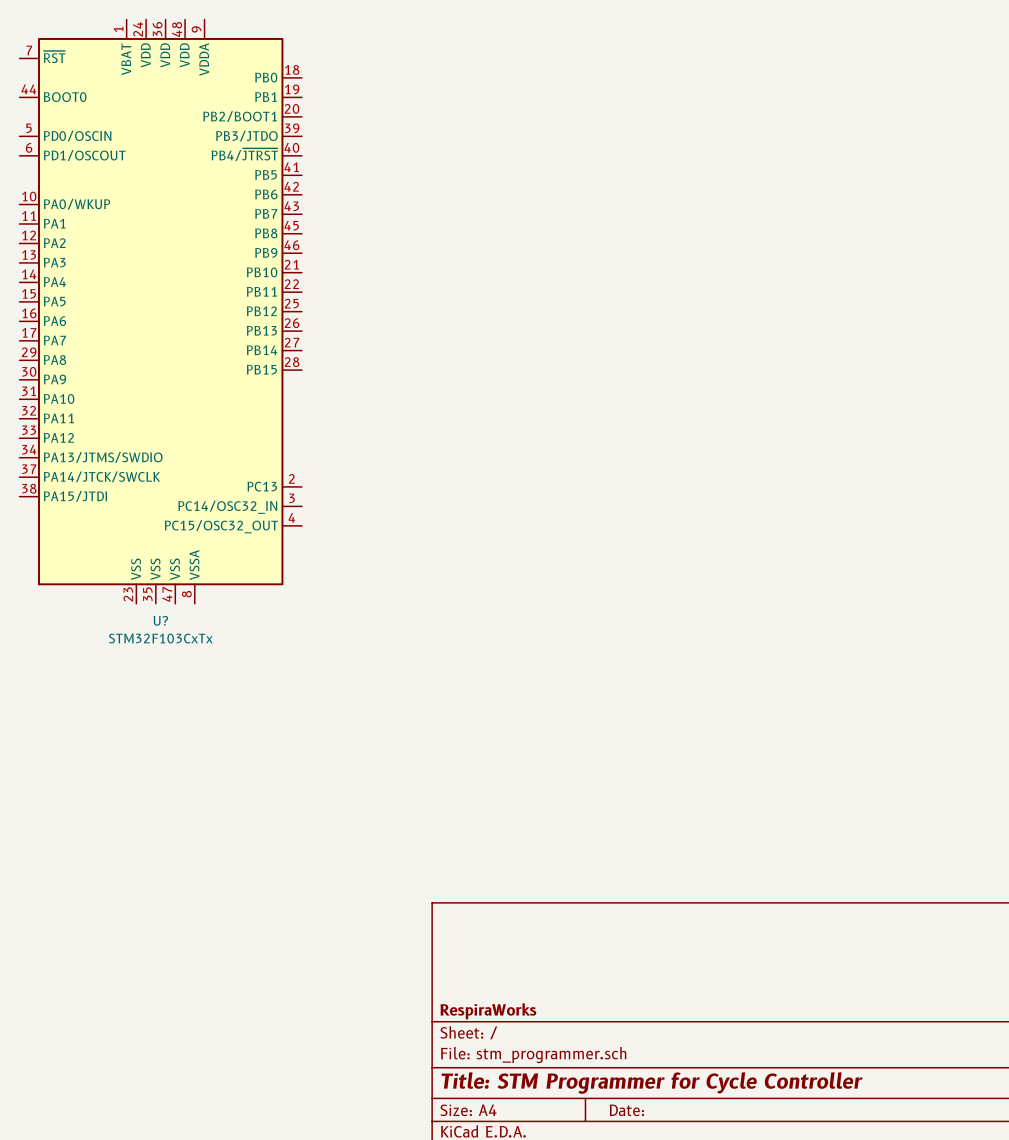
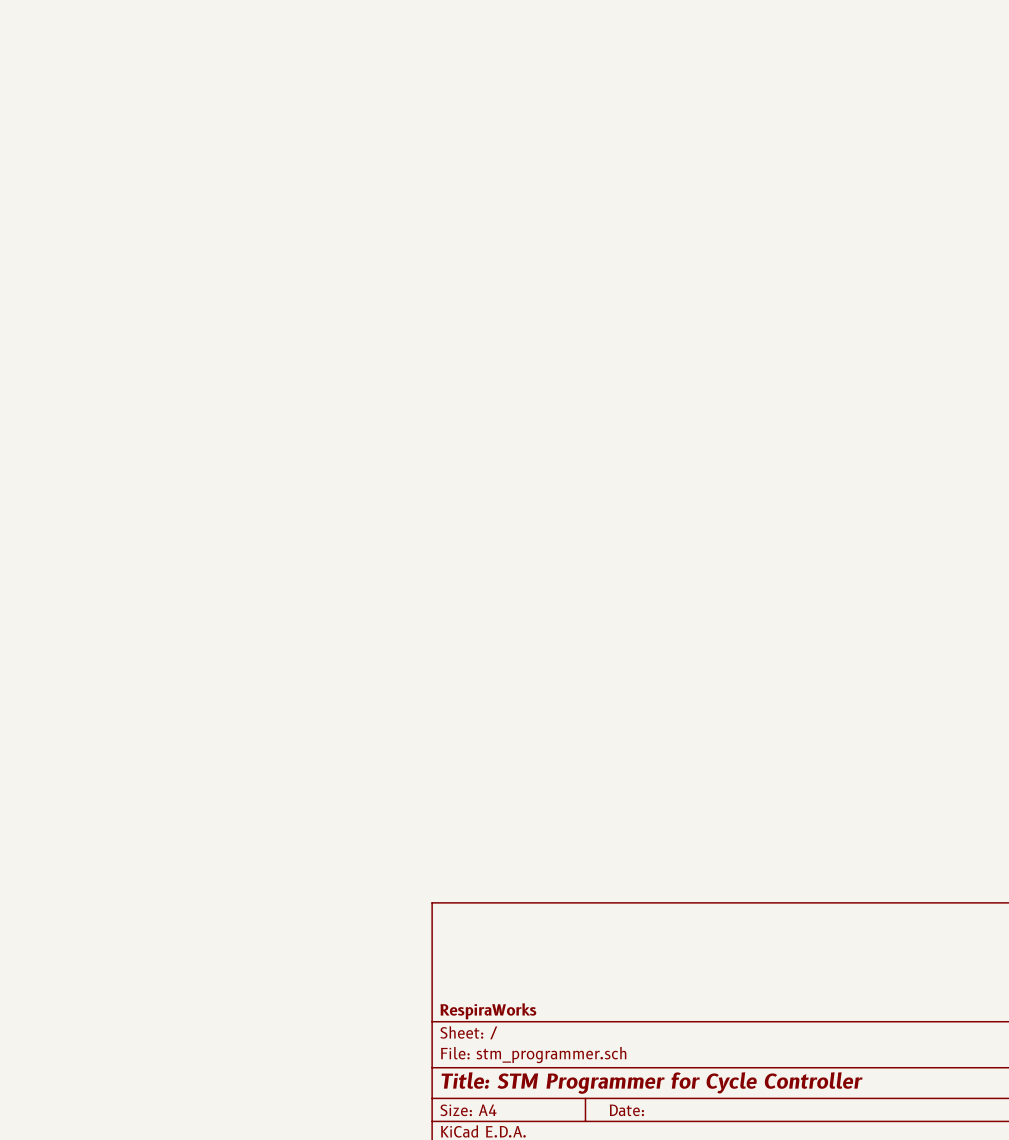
U?: STM32F103CxTx (160, 311) -> none

